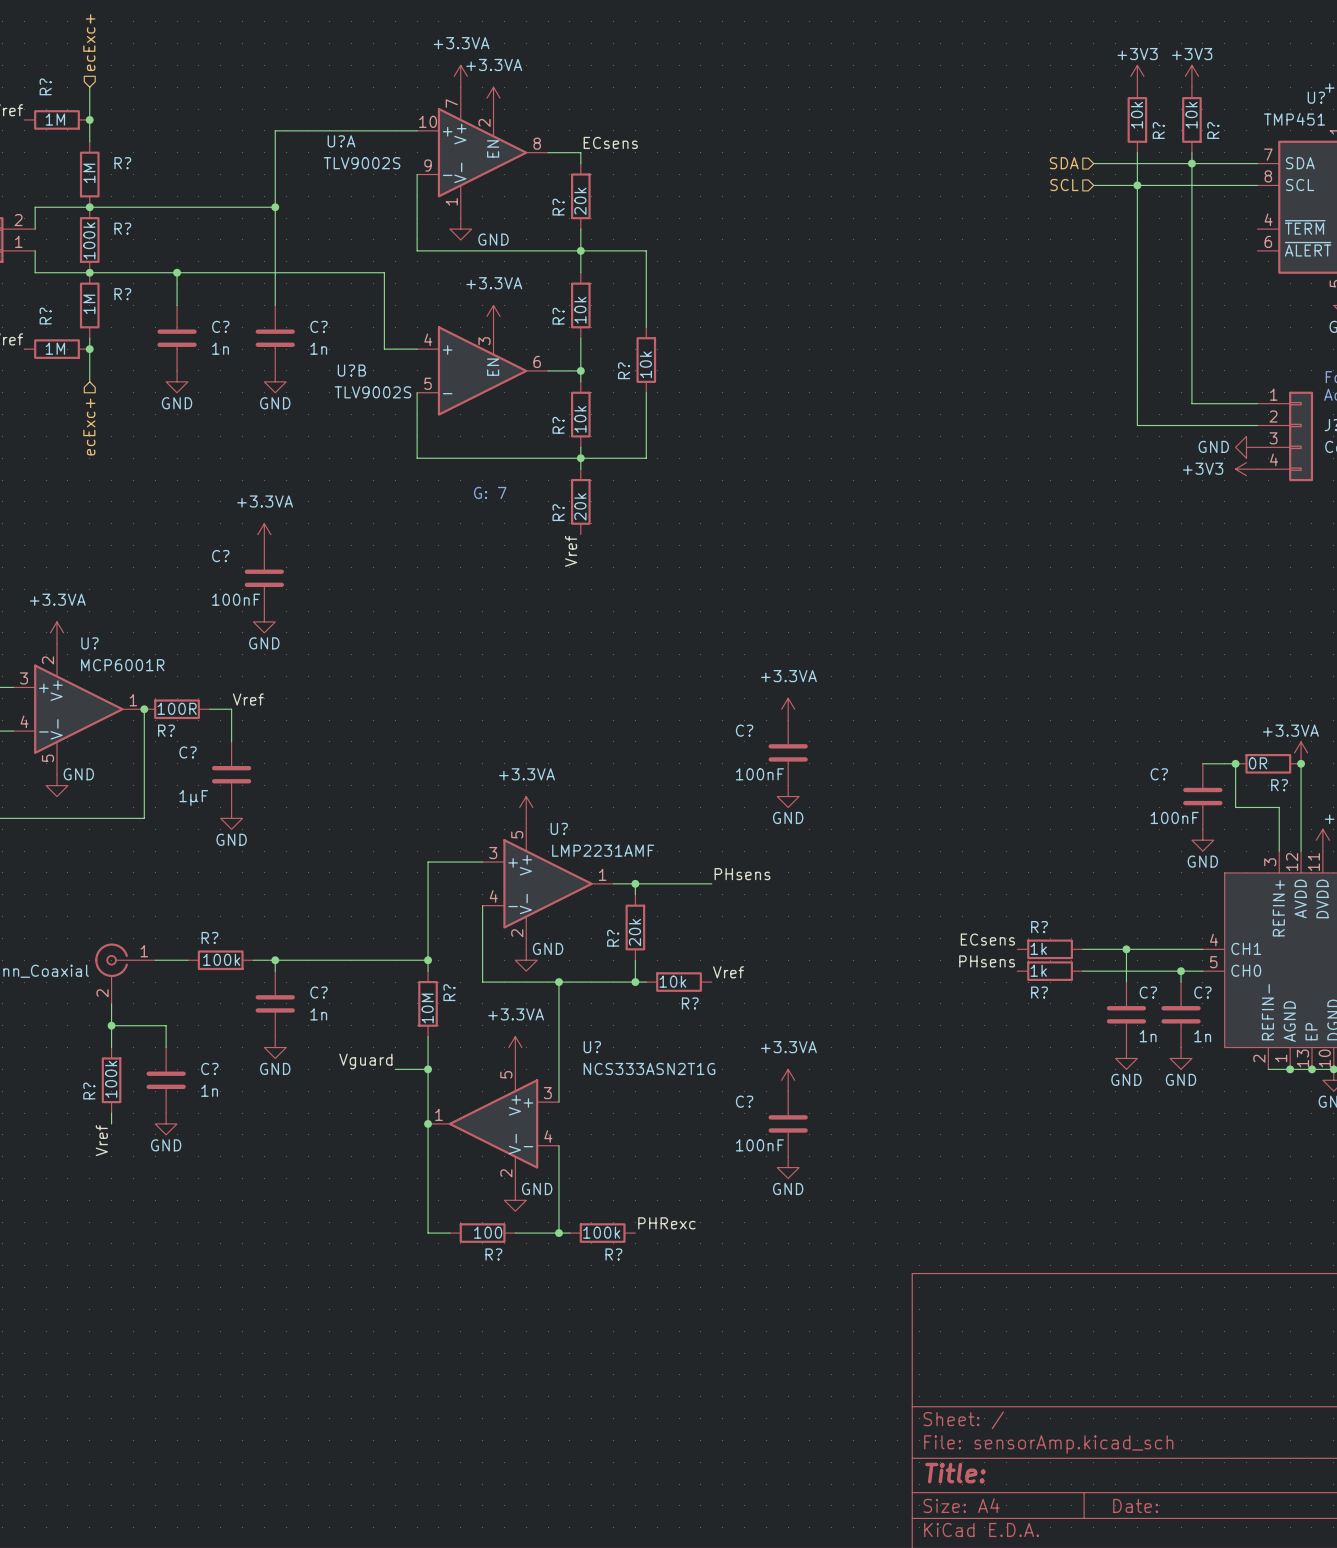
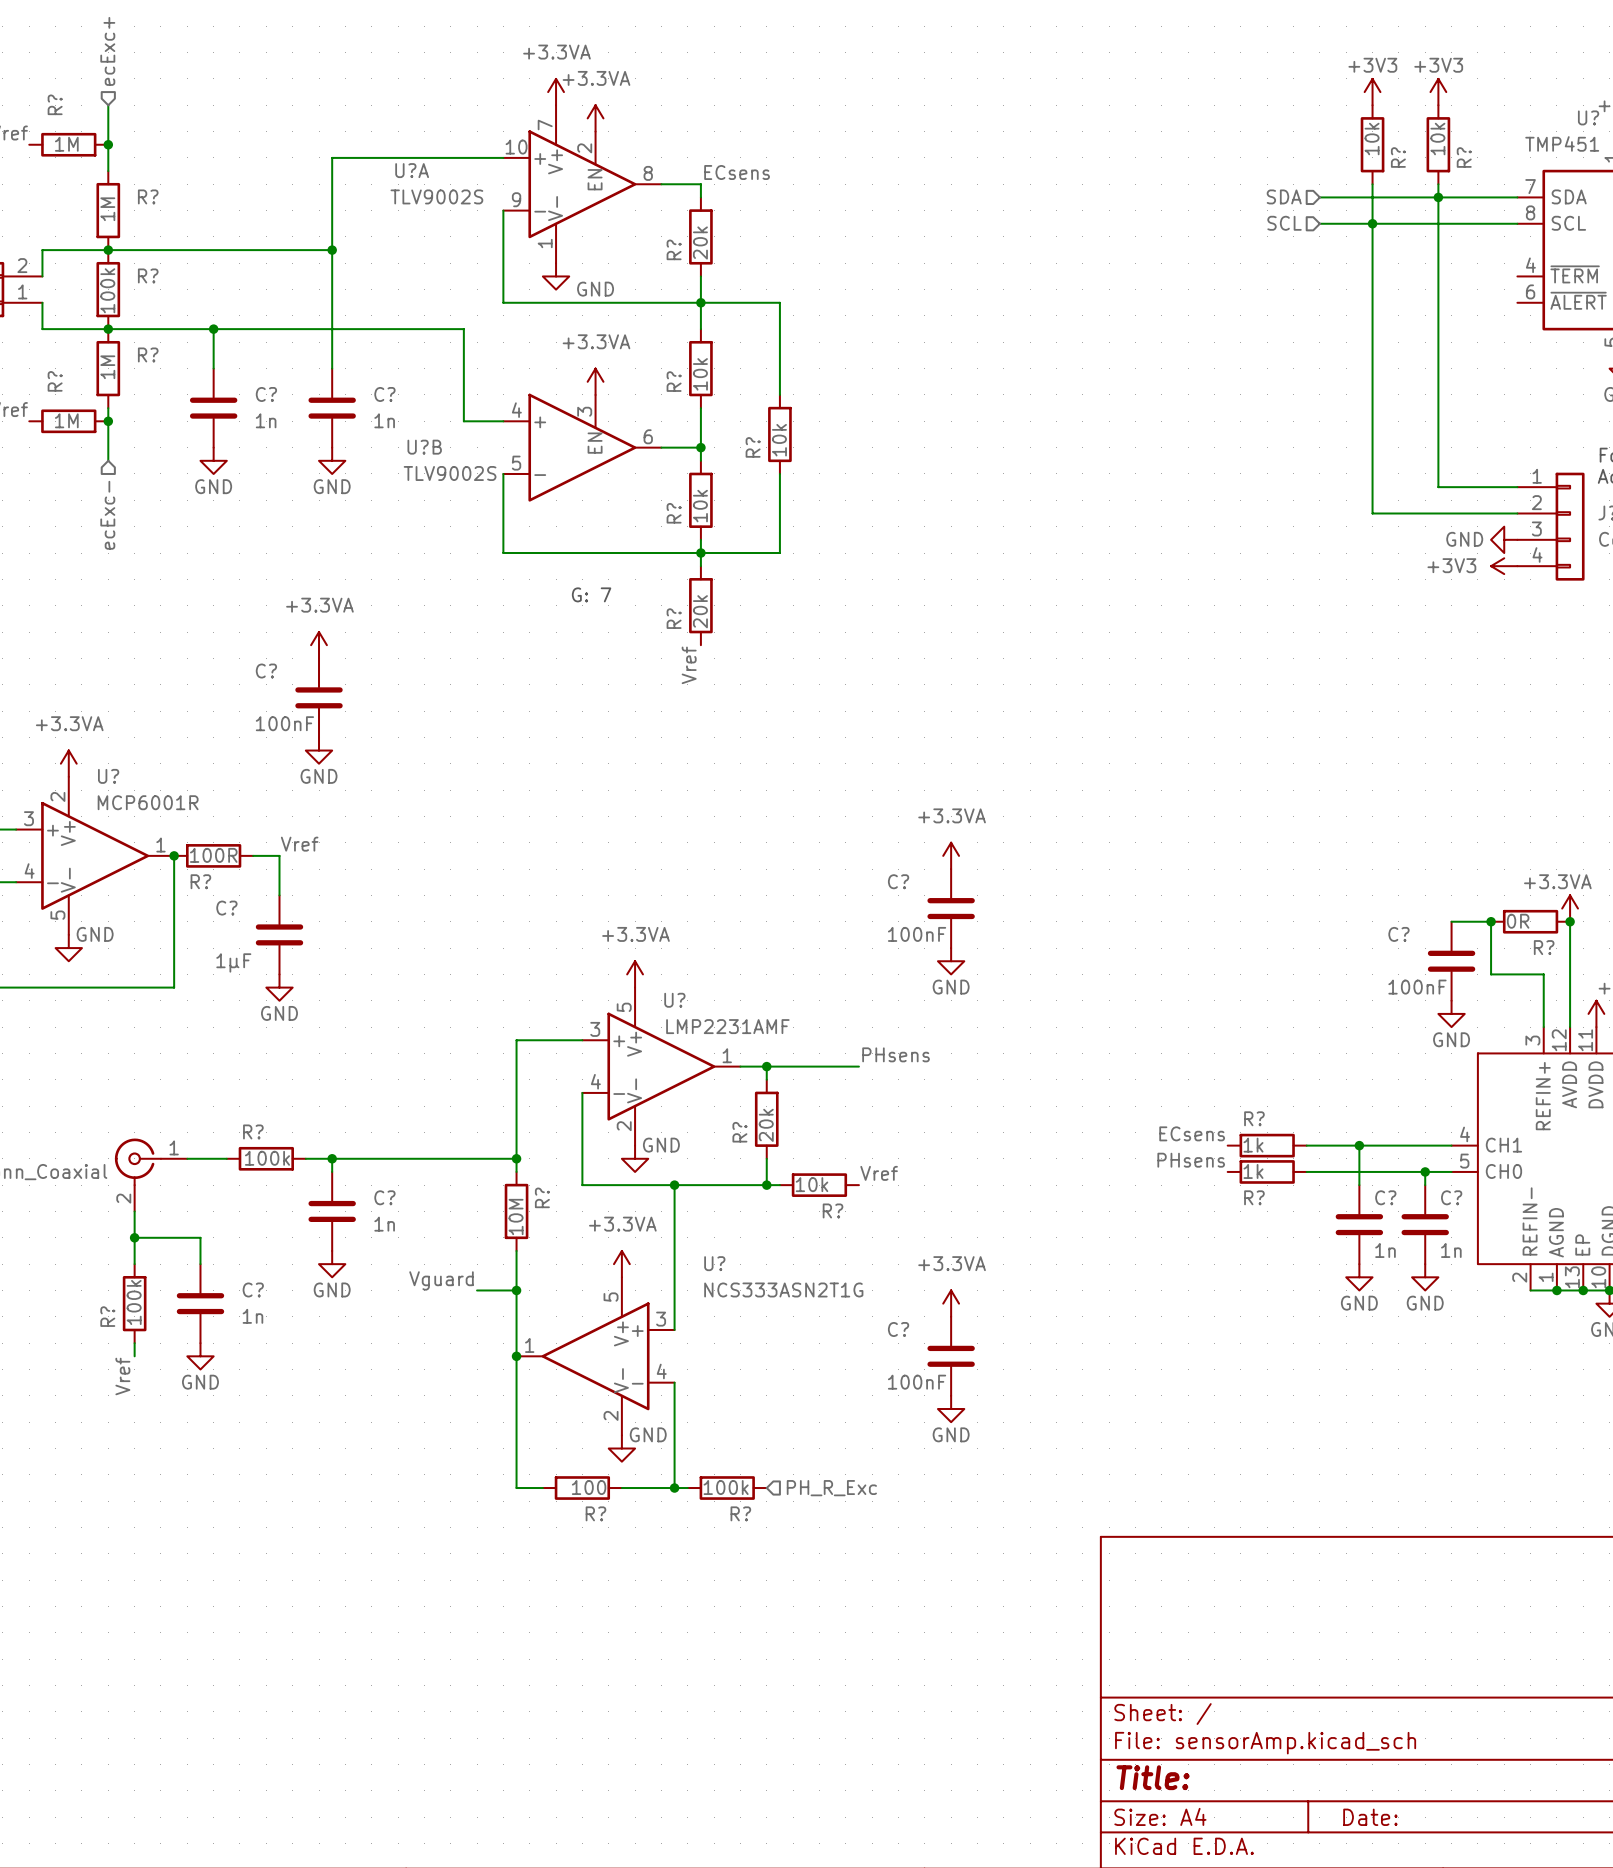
hierarchical label: ecExc+ (89, 426) -> ecExc- (107, 515)
label: PHRexc (666, 1223) -> none
hierarchical label: none -> PH_R_Exc (831, 1488)

